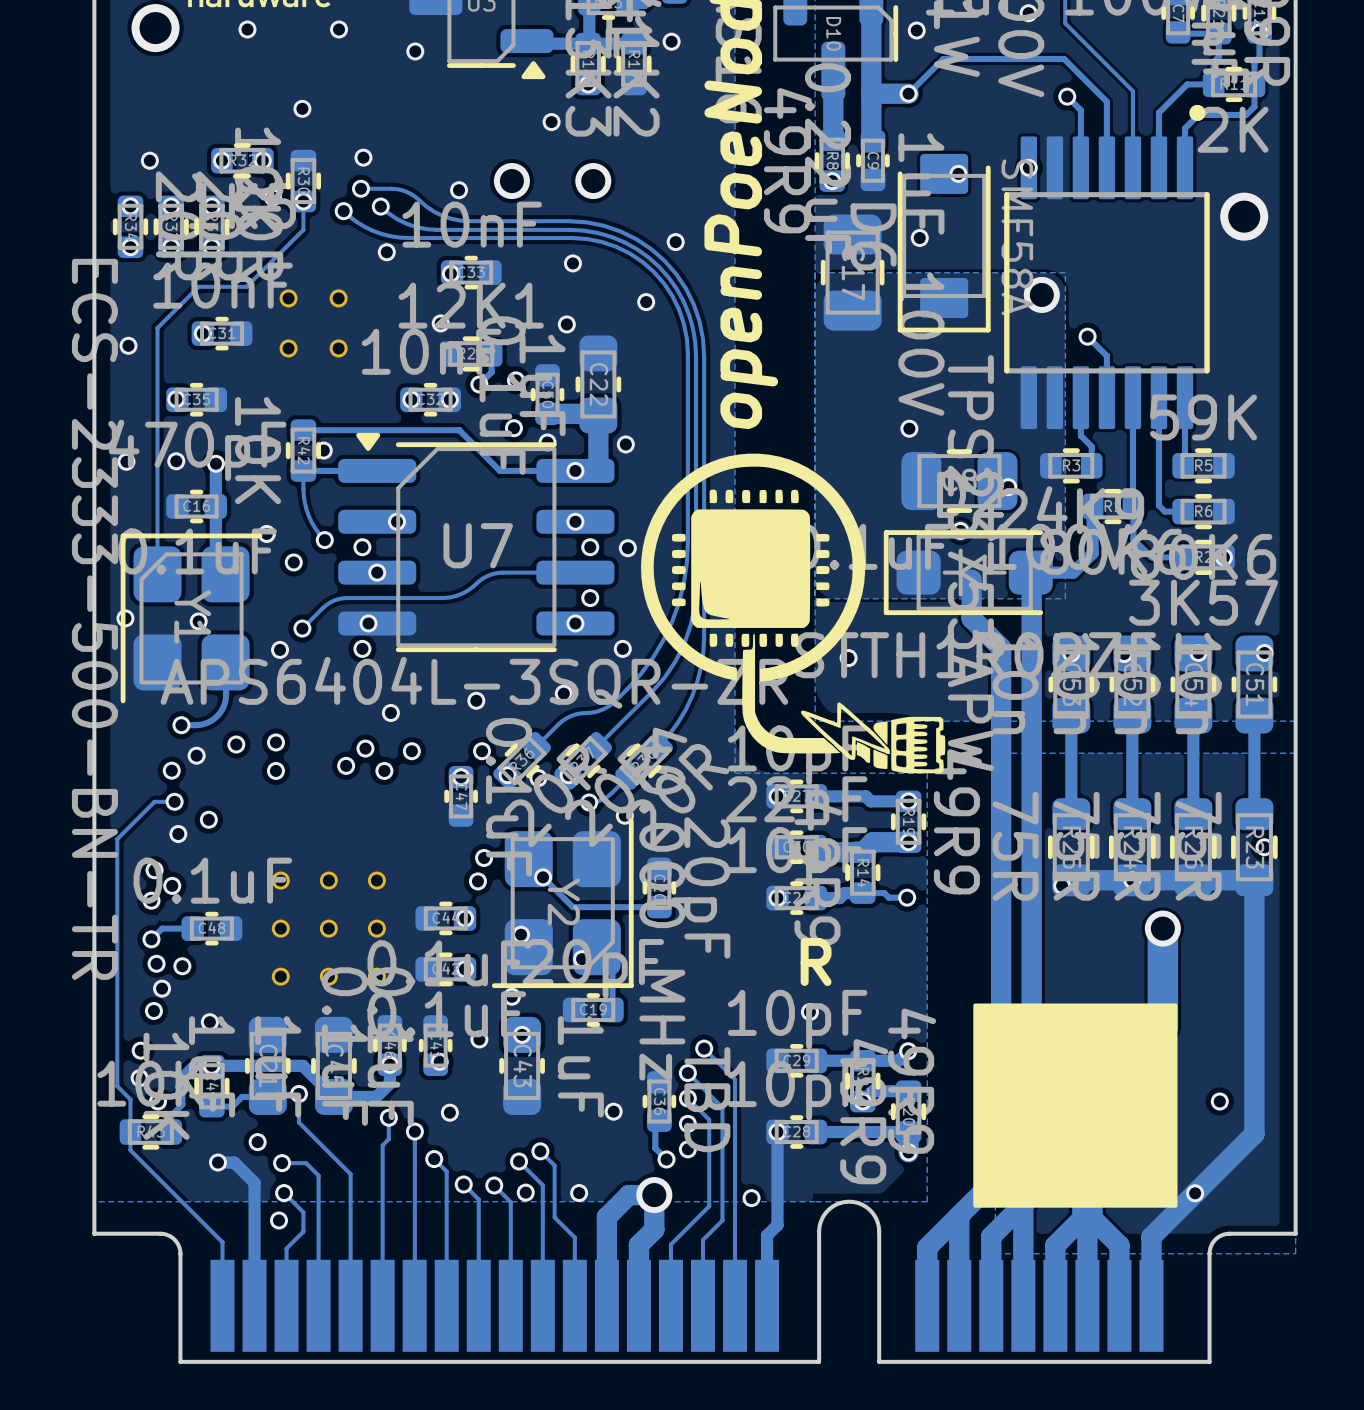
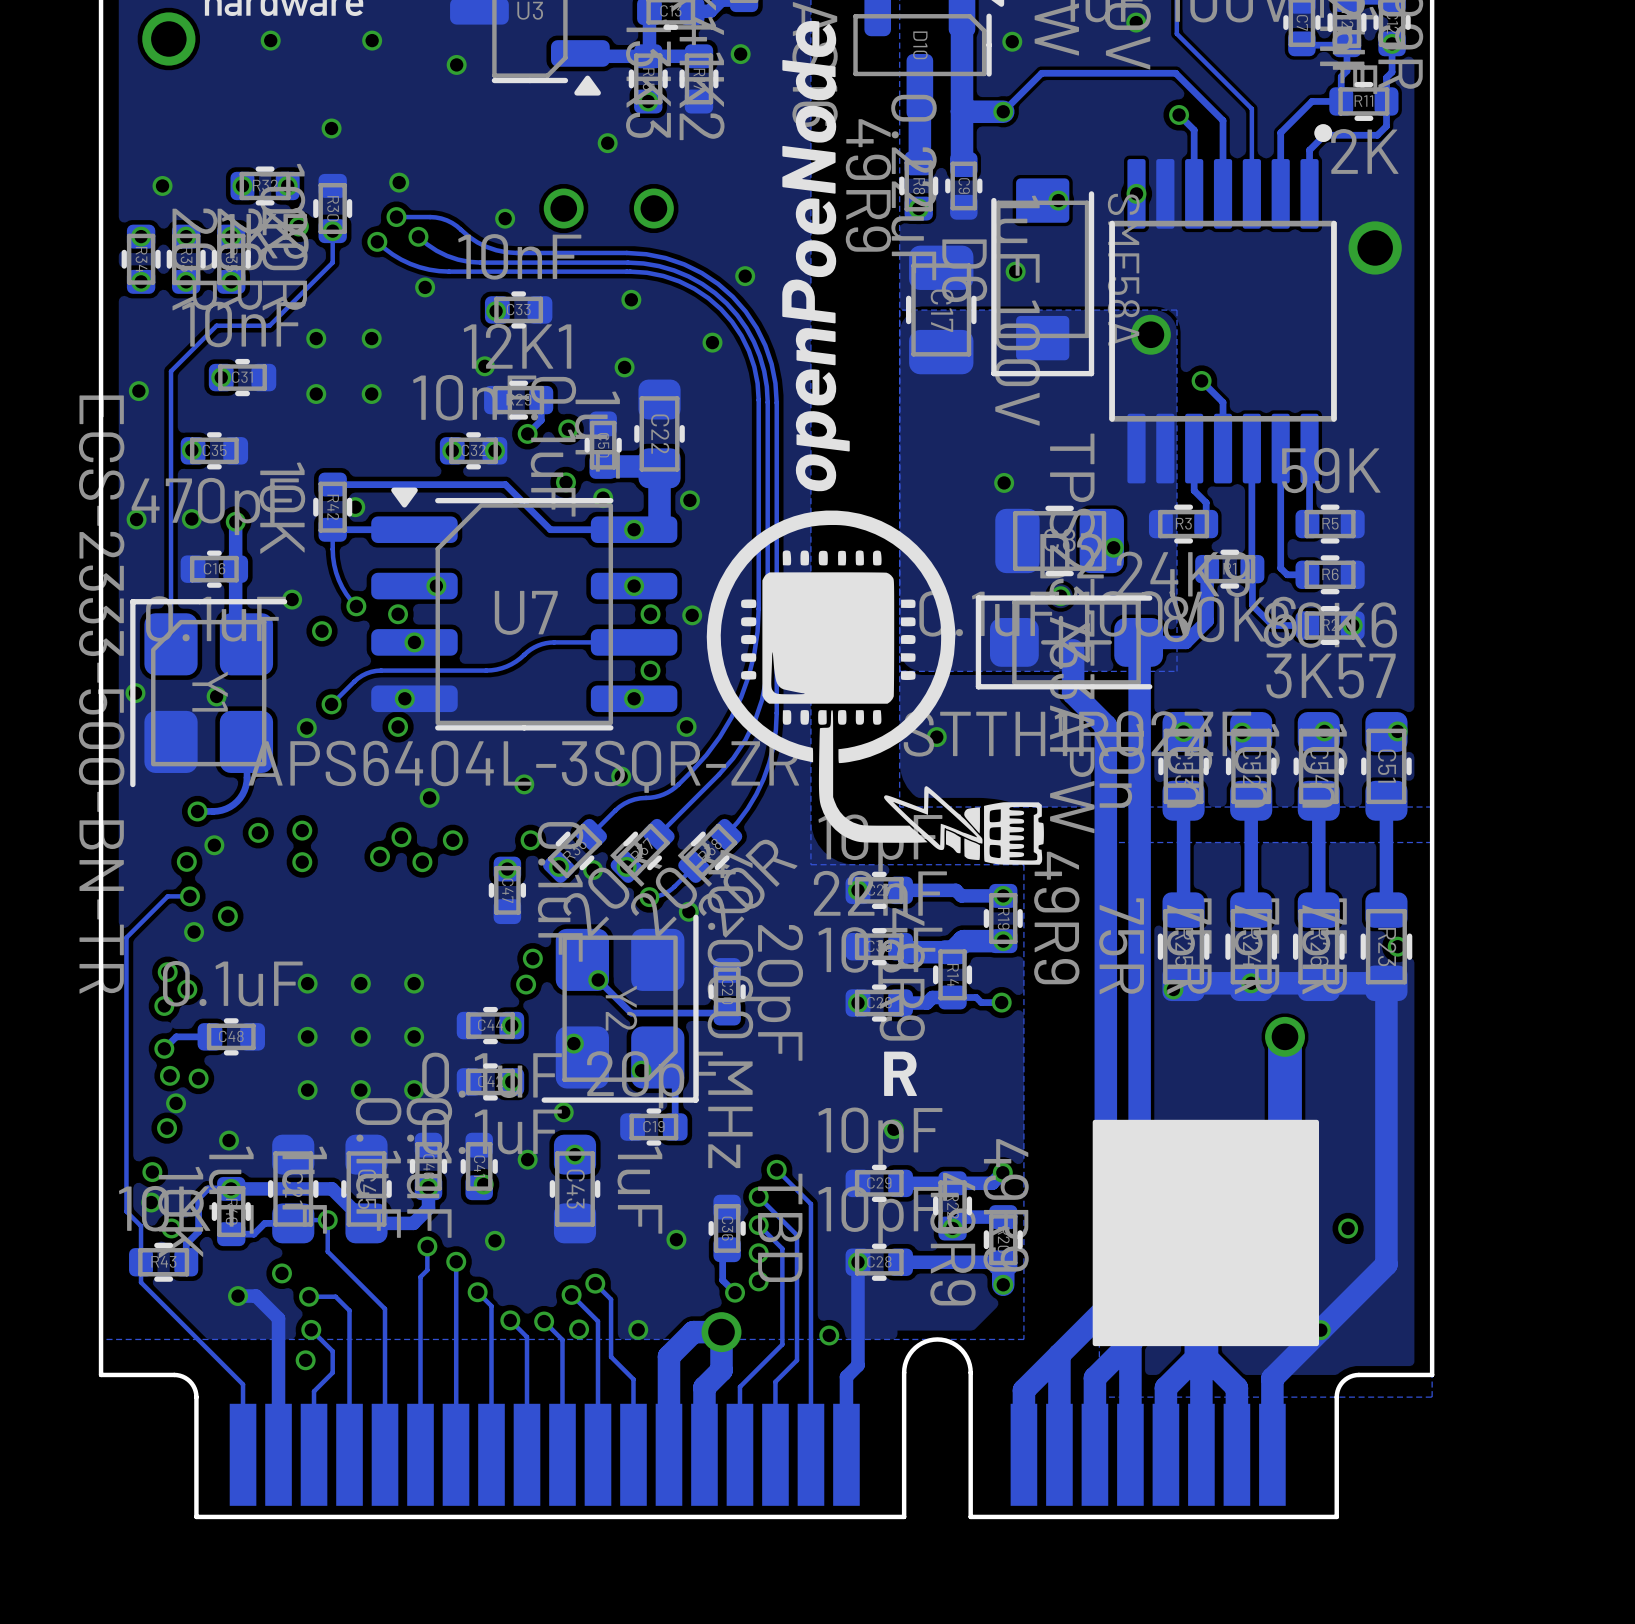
drawing position: (1075, 1105) -> (1205, 1232)

